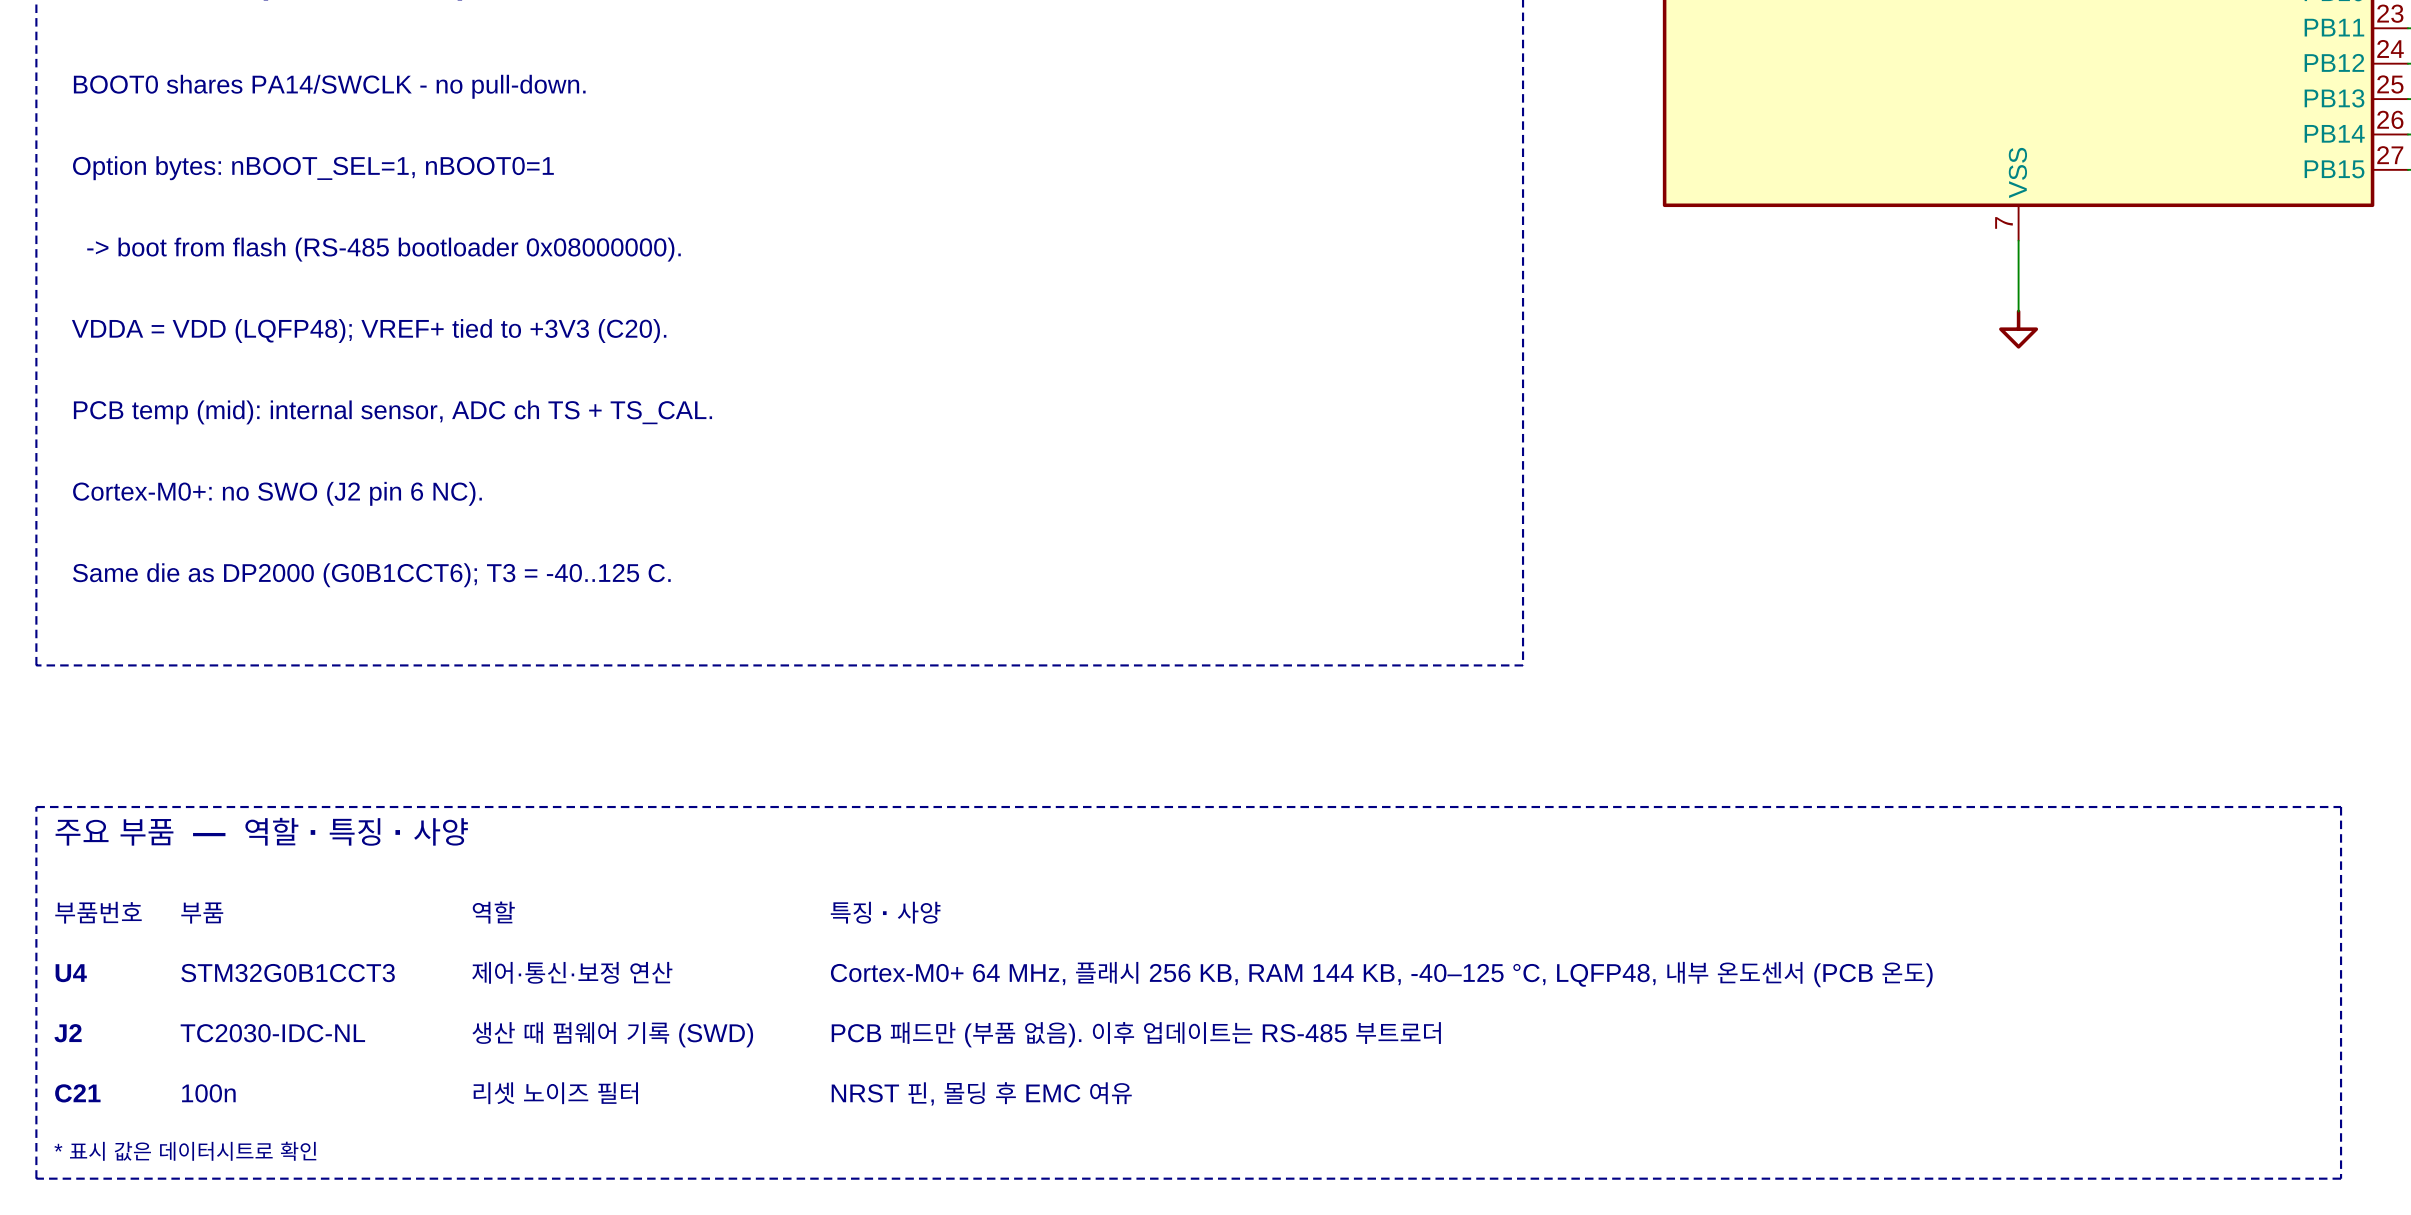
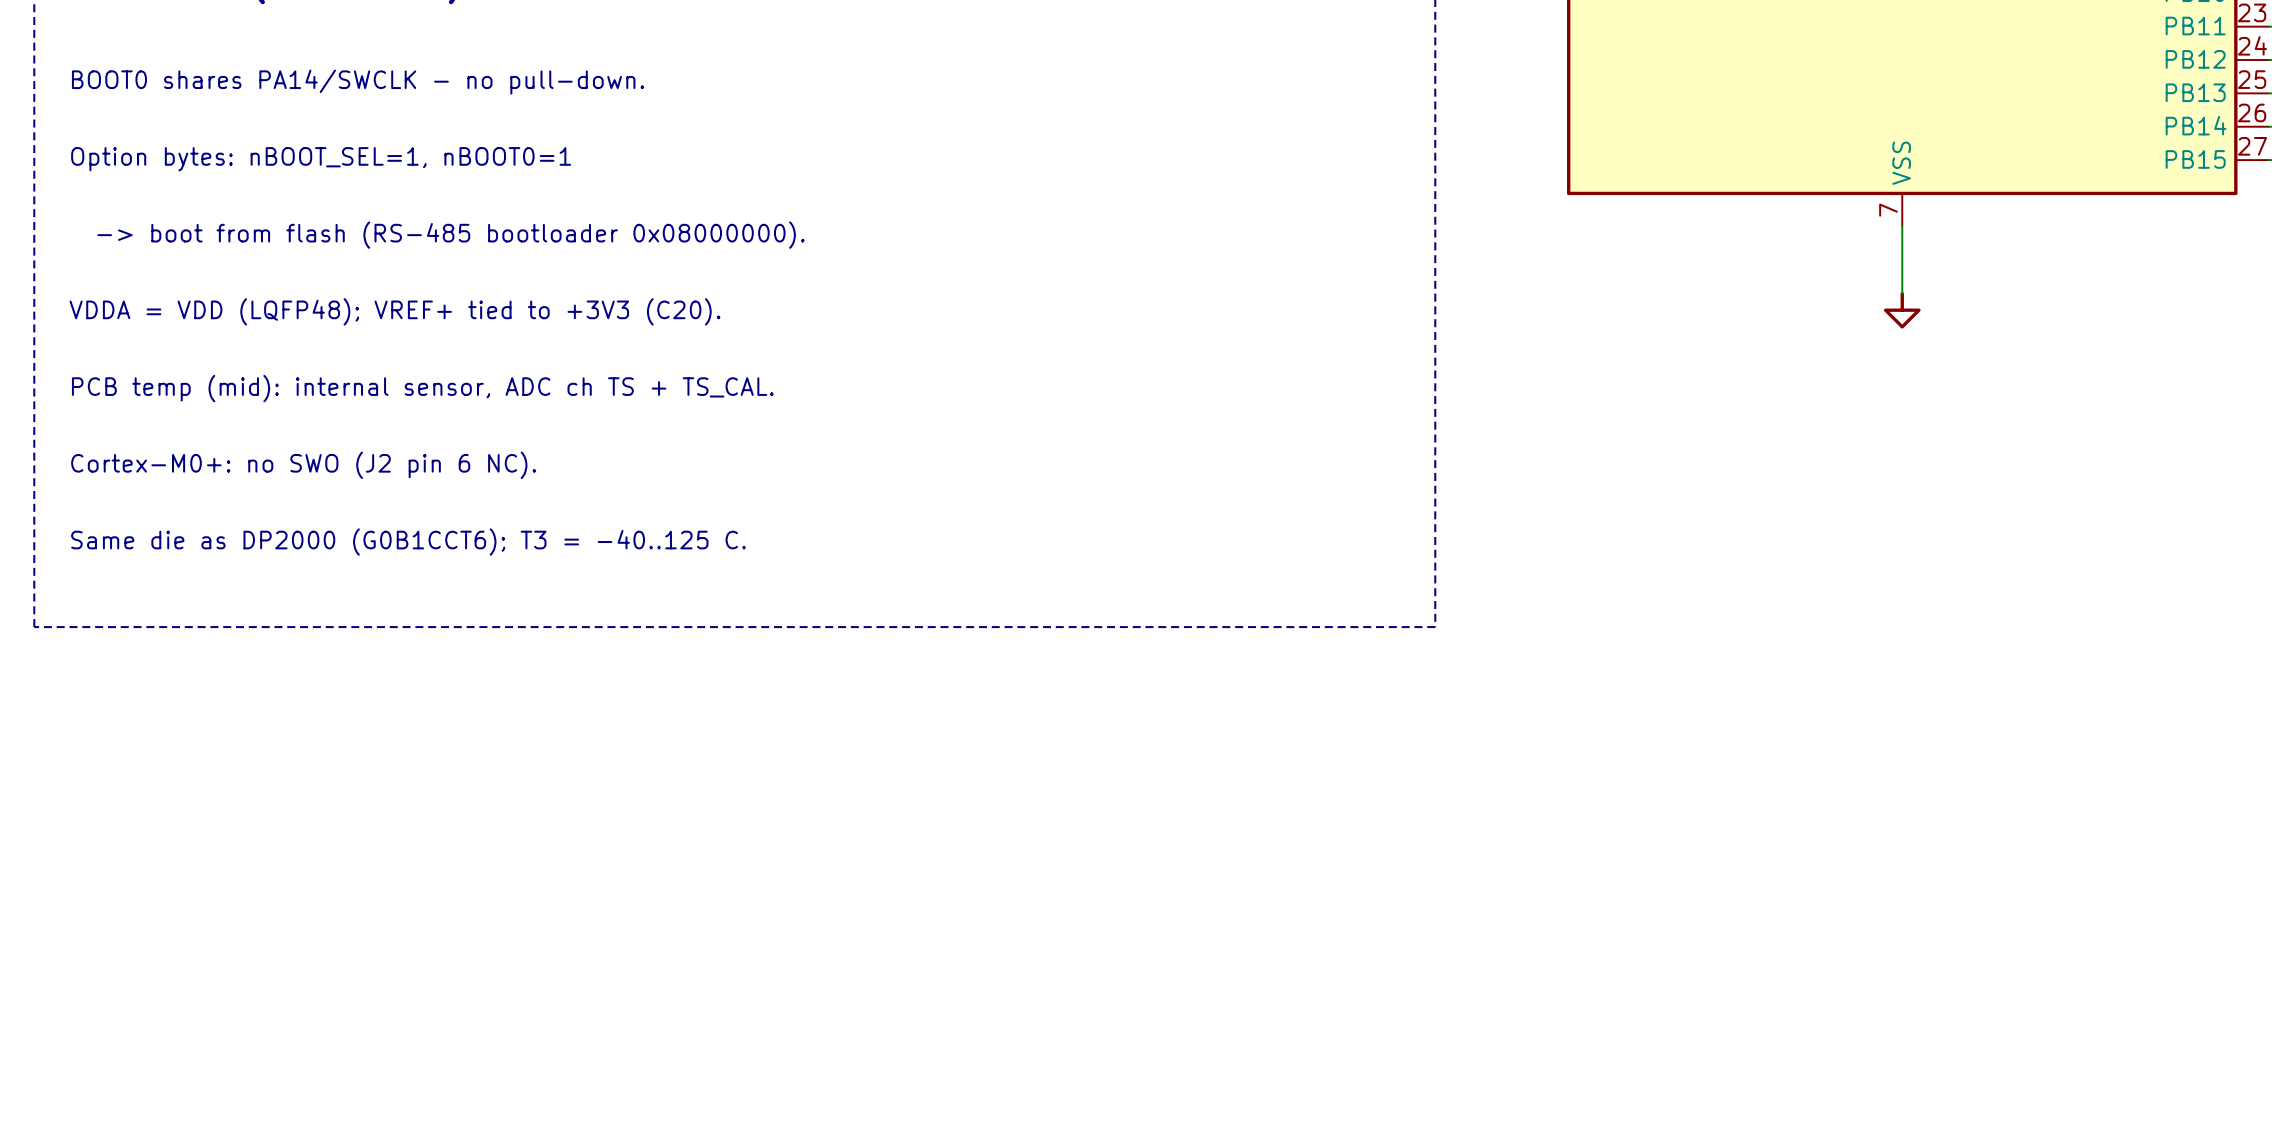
line: (36, 807) (2341, 807) (2341, 1178) (36, 1178) (36, 807) -> none
text: 주요 부품 — 역할 · 특징 · 사양 (261, 831) -> none
text: 부품번호 (98, 912) -> none
text: 역할 (493, 912) -> none
text: 특징 · 사양 (885, 912) -> none
text: 부품 (202, 913) -> none
text: 제어·통신·보정 연산 (572, 972) -> none
text: U4 (71, 973) -> none
text: STM32G0B1CCT3 (288, 973) -> none
text: Cortex-M0+ 64 MHz, 플래시 256 KB, RAM 144 KB, -40–125 °C, LQFP48, 내부 온도센서 (PCB 온도) (1381, 974) -> none
text: J2 (68, 1033) -> none
text: TC2030-IDC-NL (272, 1033) -> none
text: 생산 때 펌웨어 기록 (SWD) (612, 1034) -> none
text: PCB 패드만 (부품 없음). 이후 업데이트는 RS-485 부트로더 (1136, 1034) -> none
text: C21 (77, 1093) -> none
text: 100n (208, 1093) -> none
text: 리셋 노이즈 필터 (555, 1093) -> none
text: NRST 핀, 몰딩 후 EMC 여유 (981, 1093) -> none
text: * 표시 값은 데이터시트로 확인 (185, 1151) -> none

